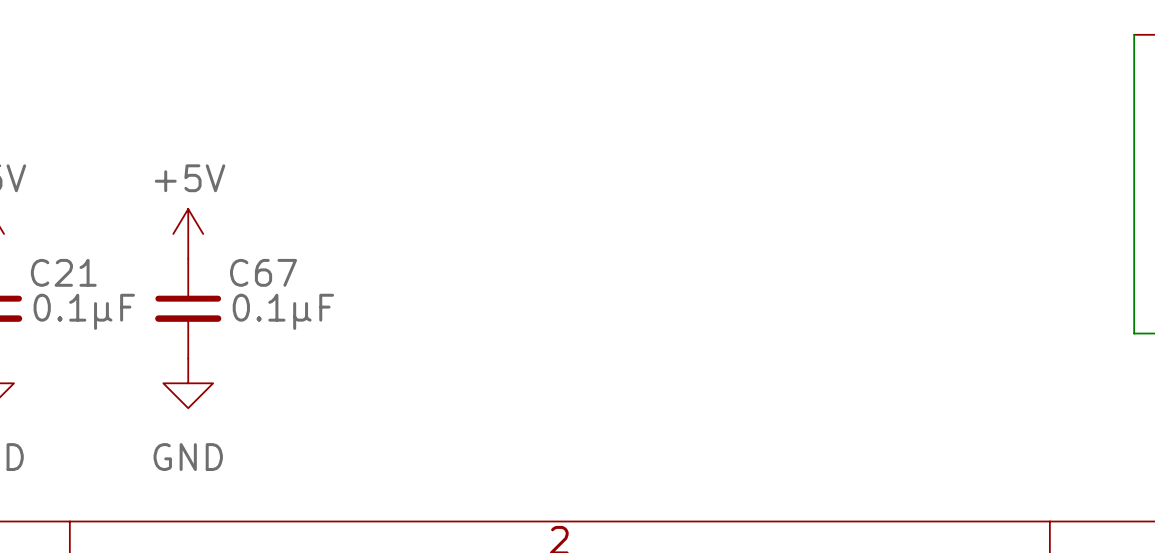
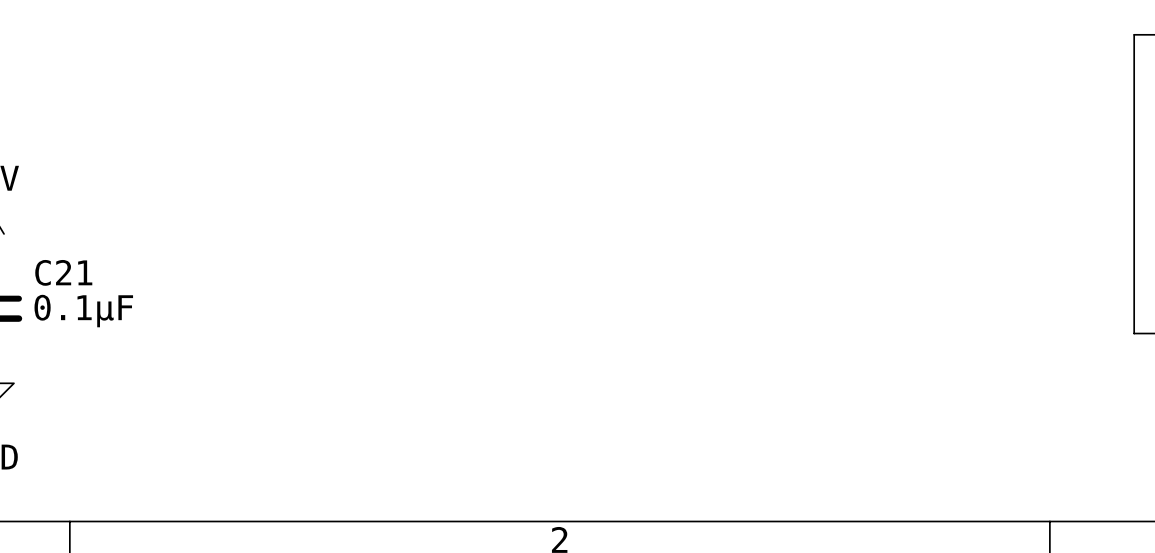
power symbol: +5V (188, 233) -> none
C67: 0.1µF (188, 308) -> none
power symbol: GND (188, 383) -> none

